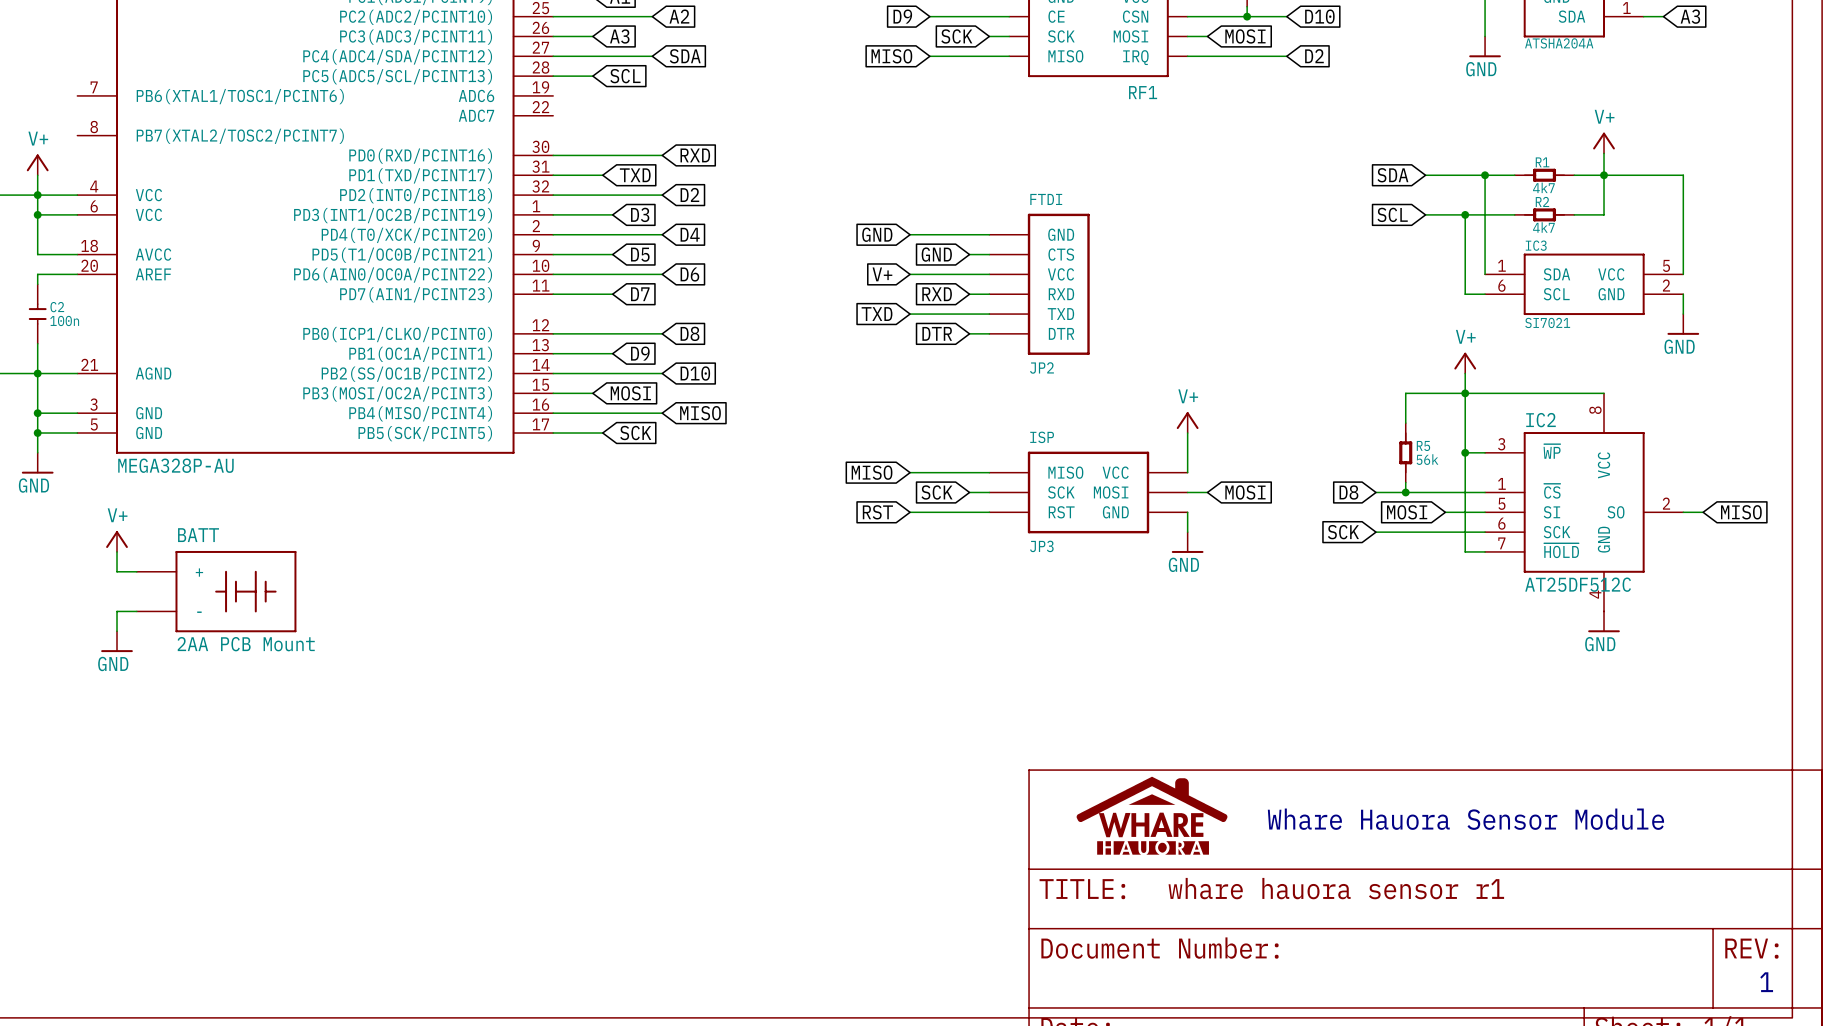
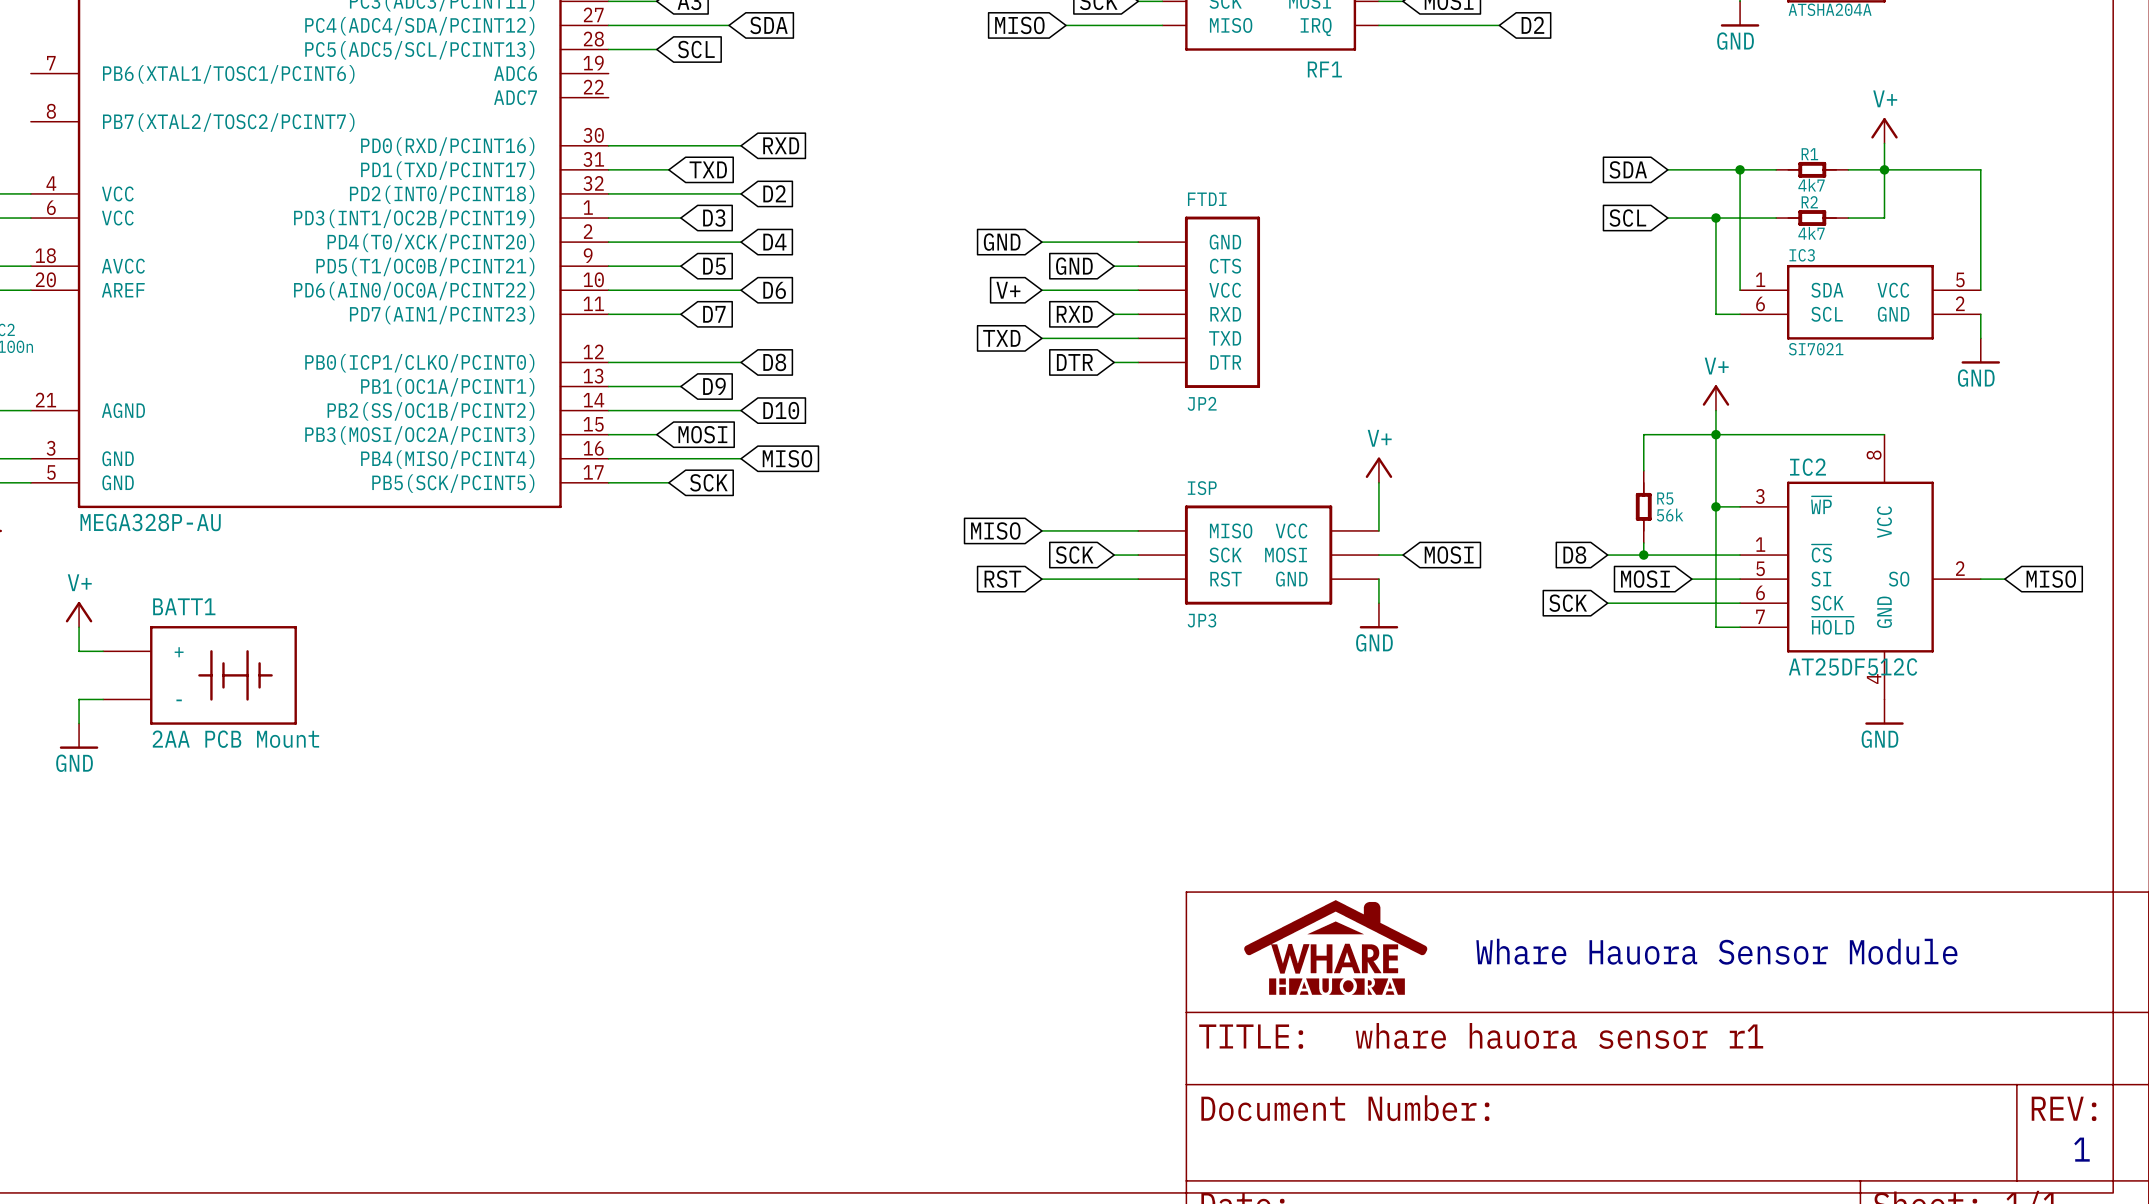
BATT name: BATT (198, 535) -> BATT1 (184, 606)

